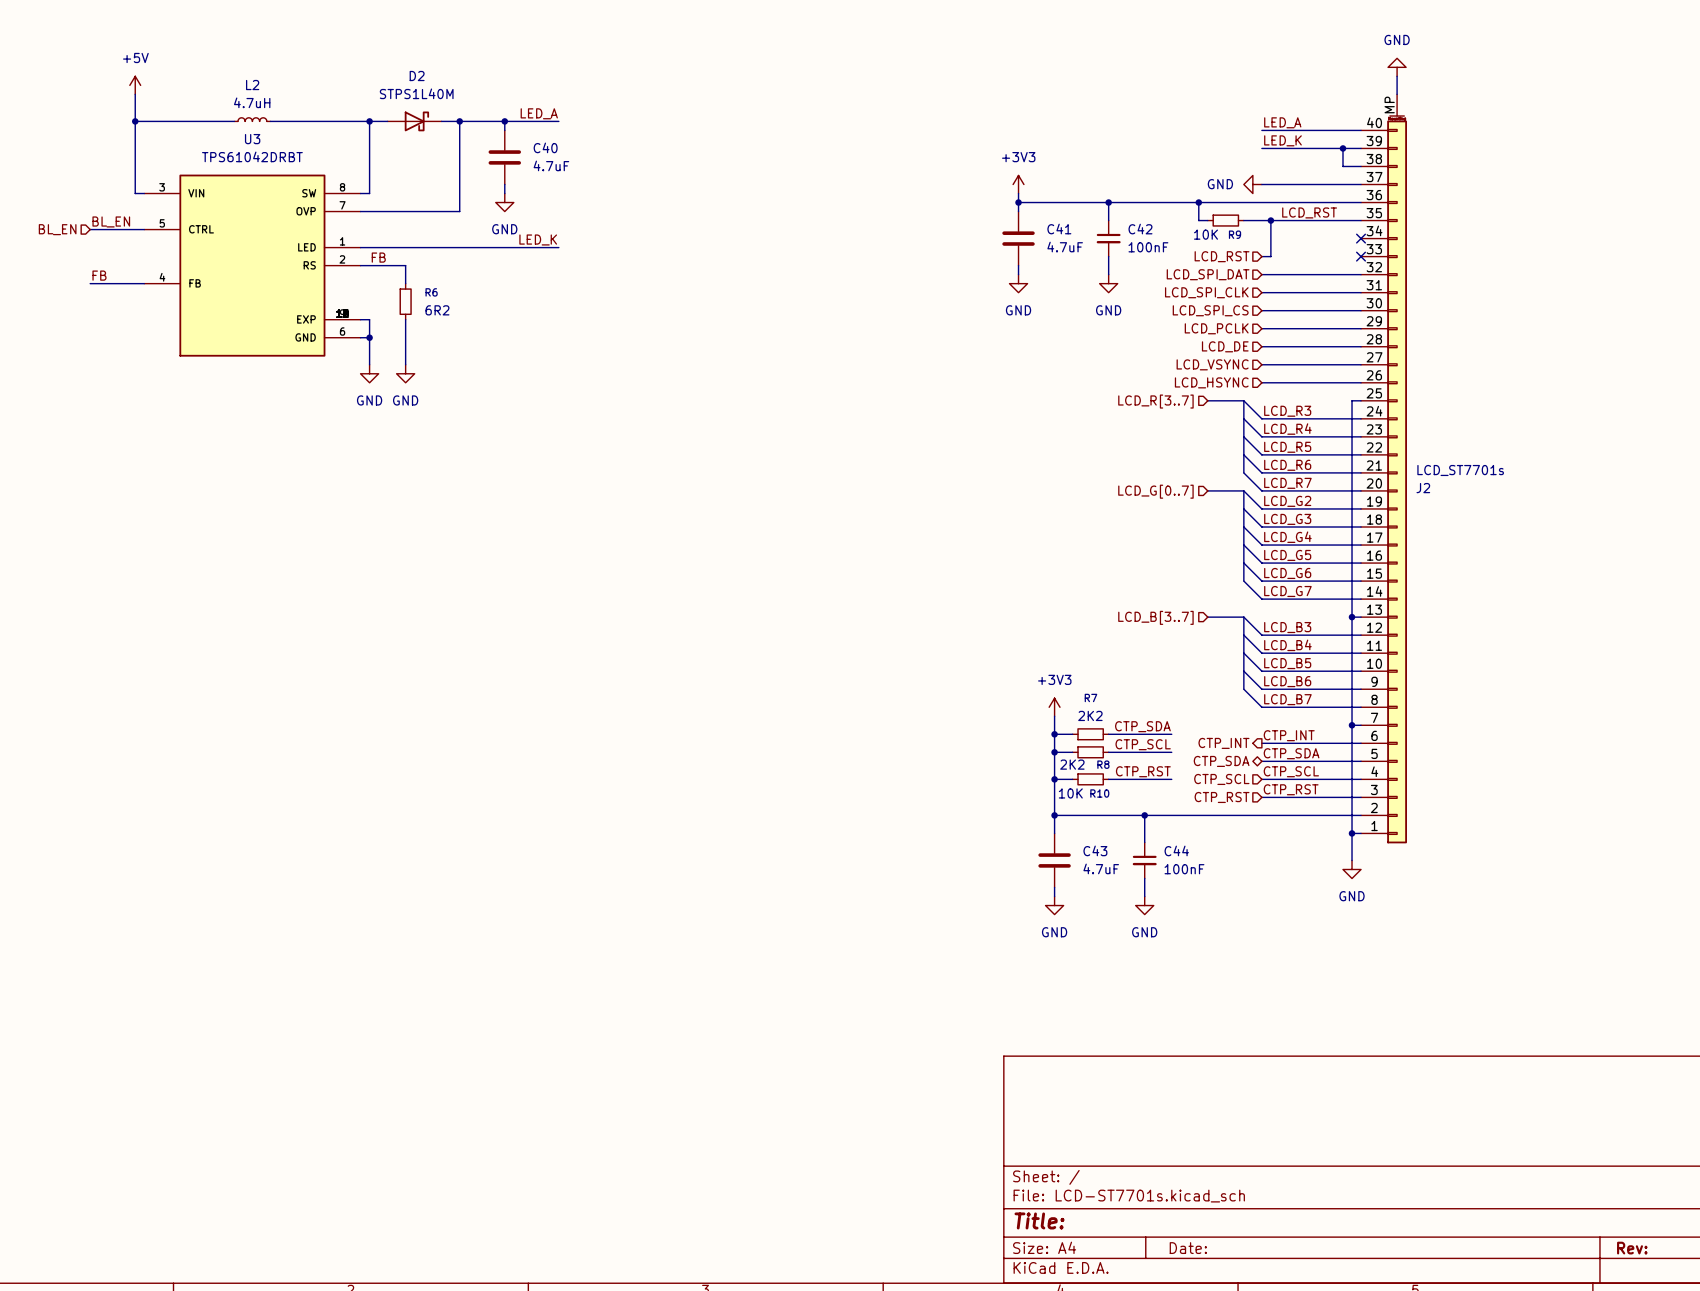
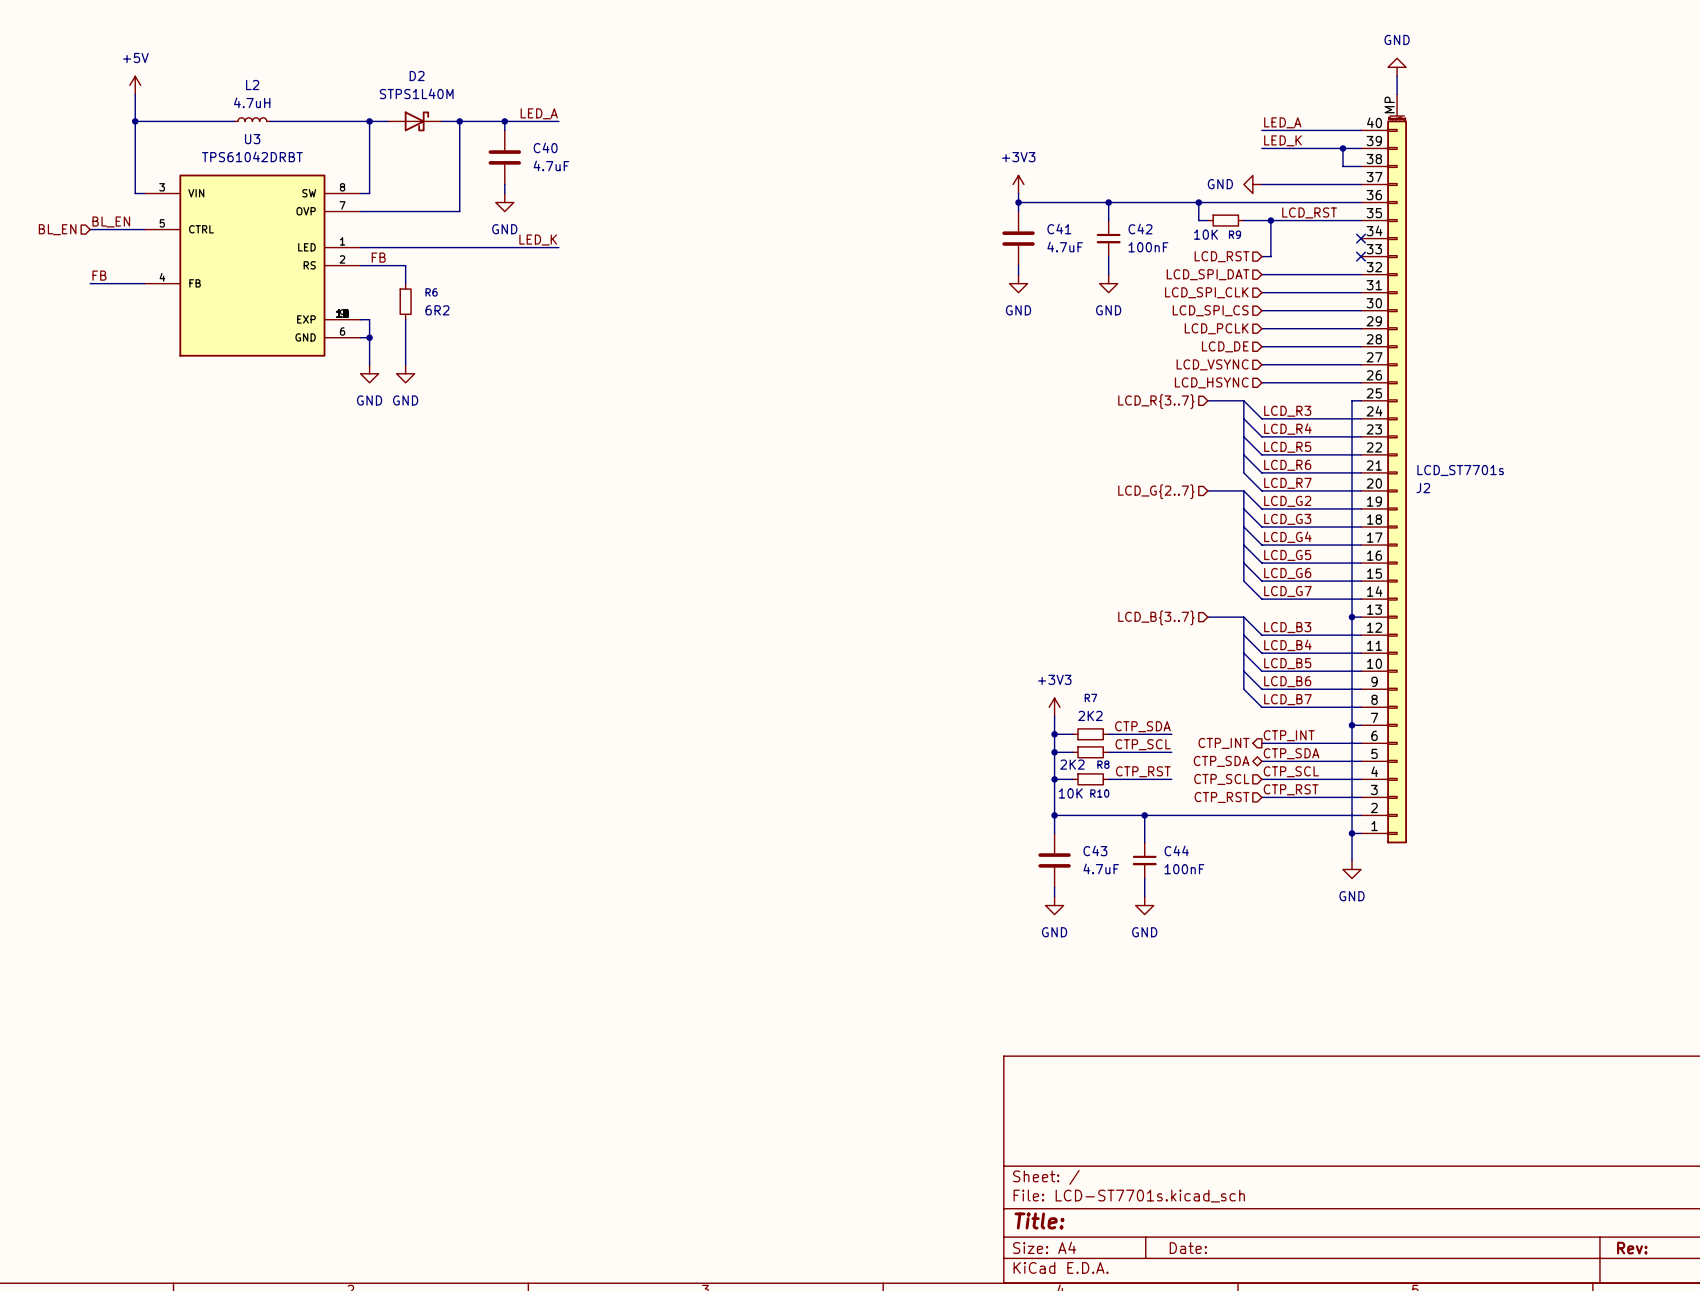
hierarchical label: LCD_R[3..7] (1155, 401) -> LCD_R{3..7} (1156, 401)
hierarchical label: LCD_G[0..7] (1155, 491) -> LCD_G{2..7} (1156, 491)
hierarchical label: LCD_B[3..7] (1155, 617) -> LCD_B{3..7} (1156, 617)

